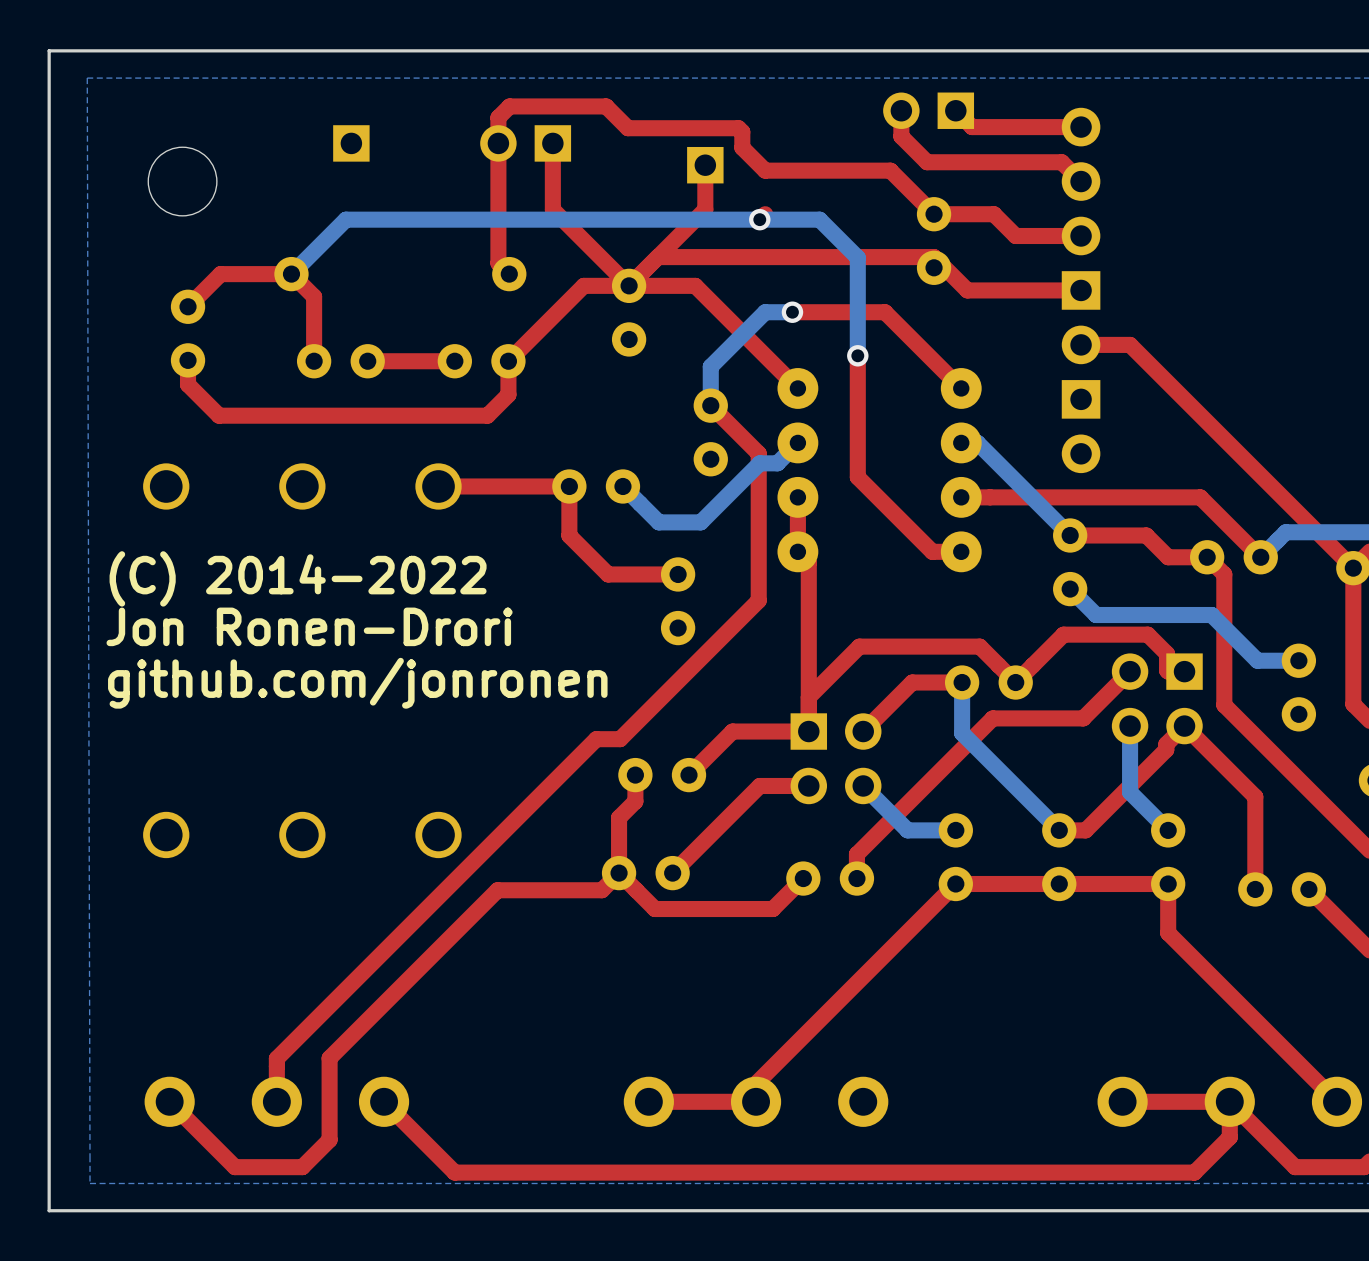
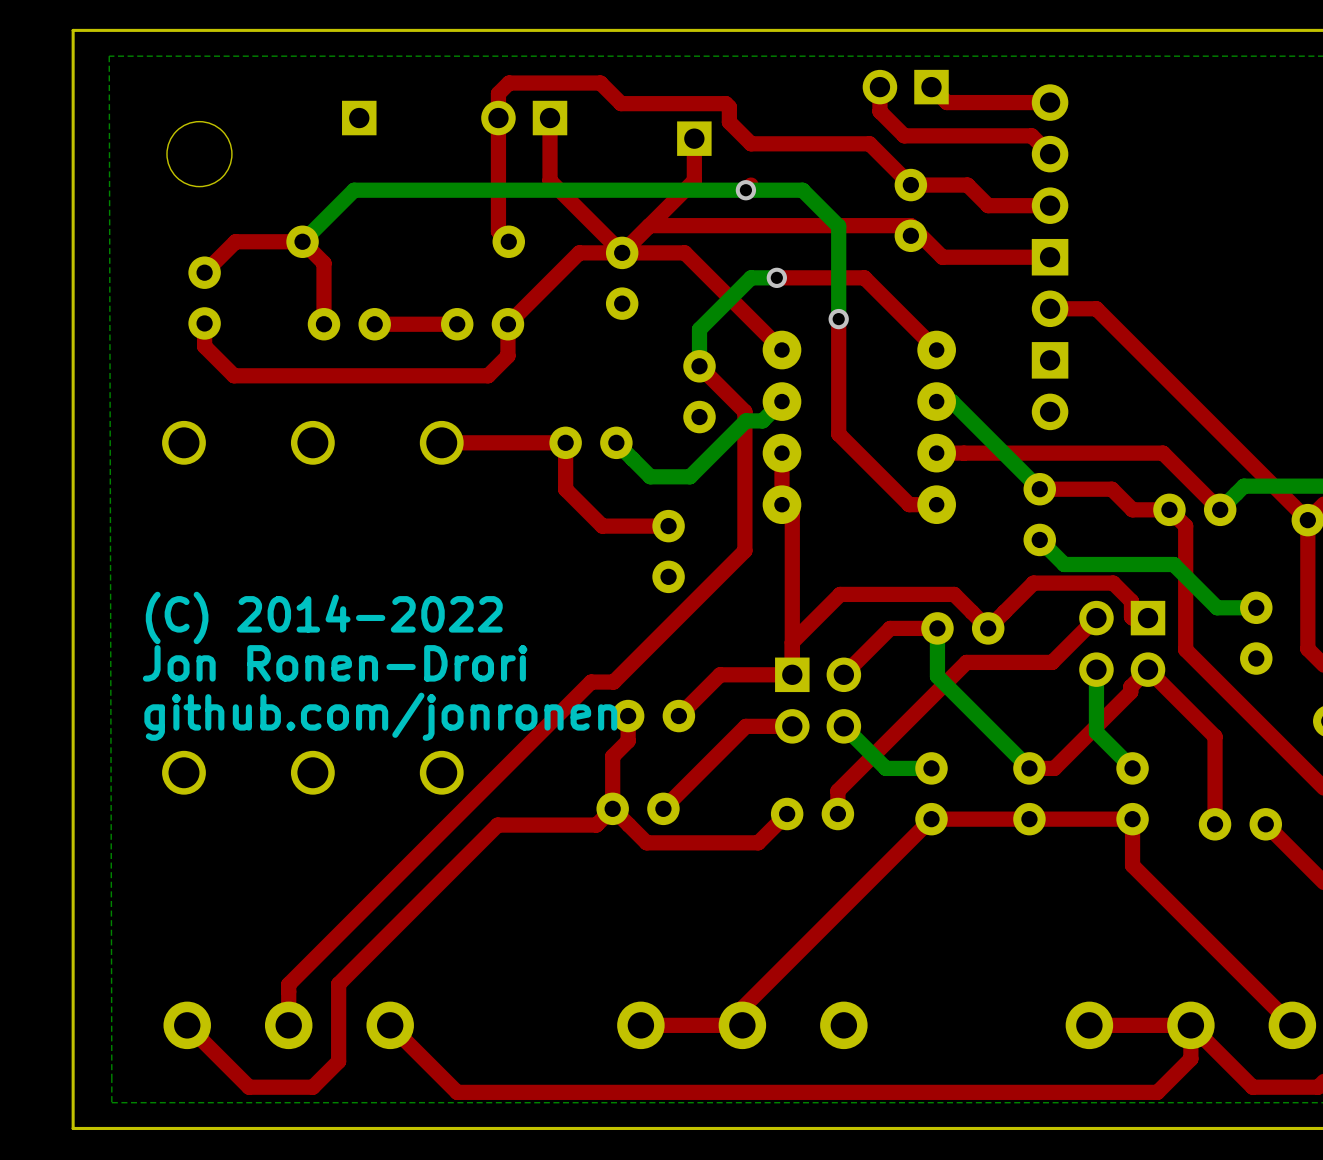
text: (C) 2014-2022 (298, 578) -> none
text position: Jon Ronen-Drori (309, 626) -> Jon Ronen-Drori (335, 663)
text: github.com/jonronen (357, 683) -> (C) 2014-2022 (324, 617)
text: none -> github.com/jonronen (380, 716)

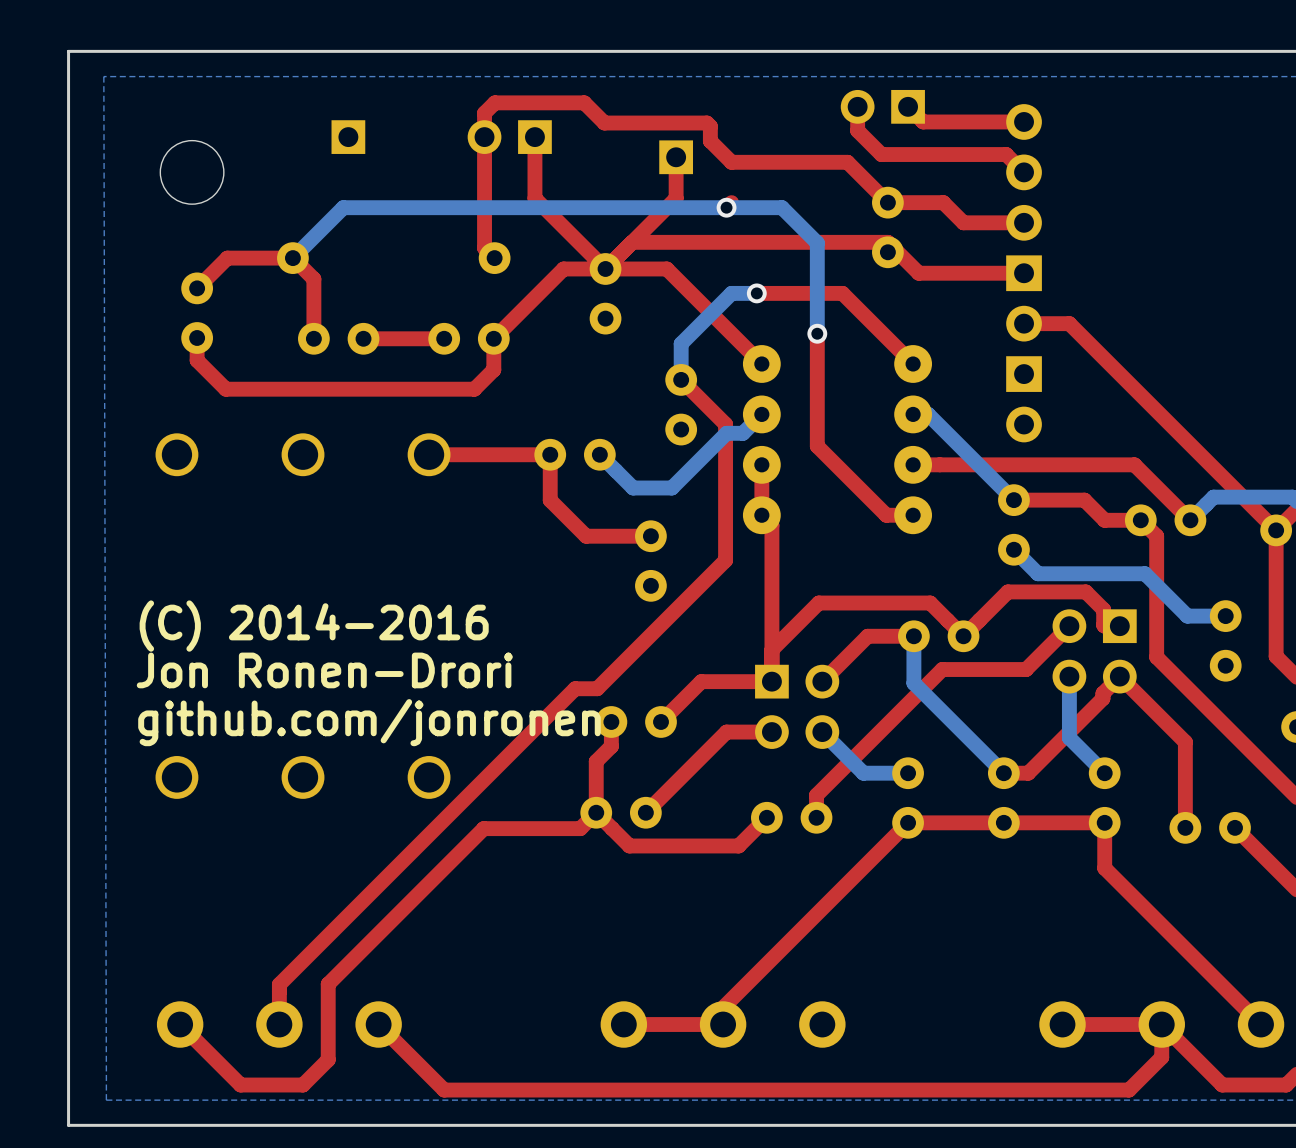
text: (C) 2014-2022 (324, 617) -> (C) 2014-2016 (314, 626)

